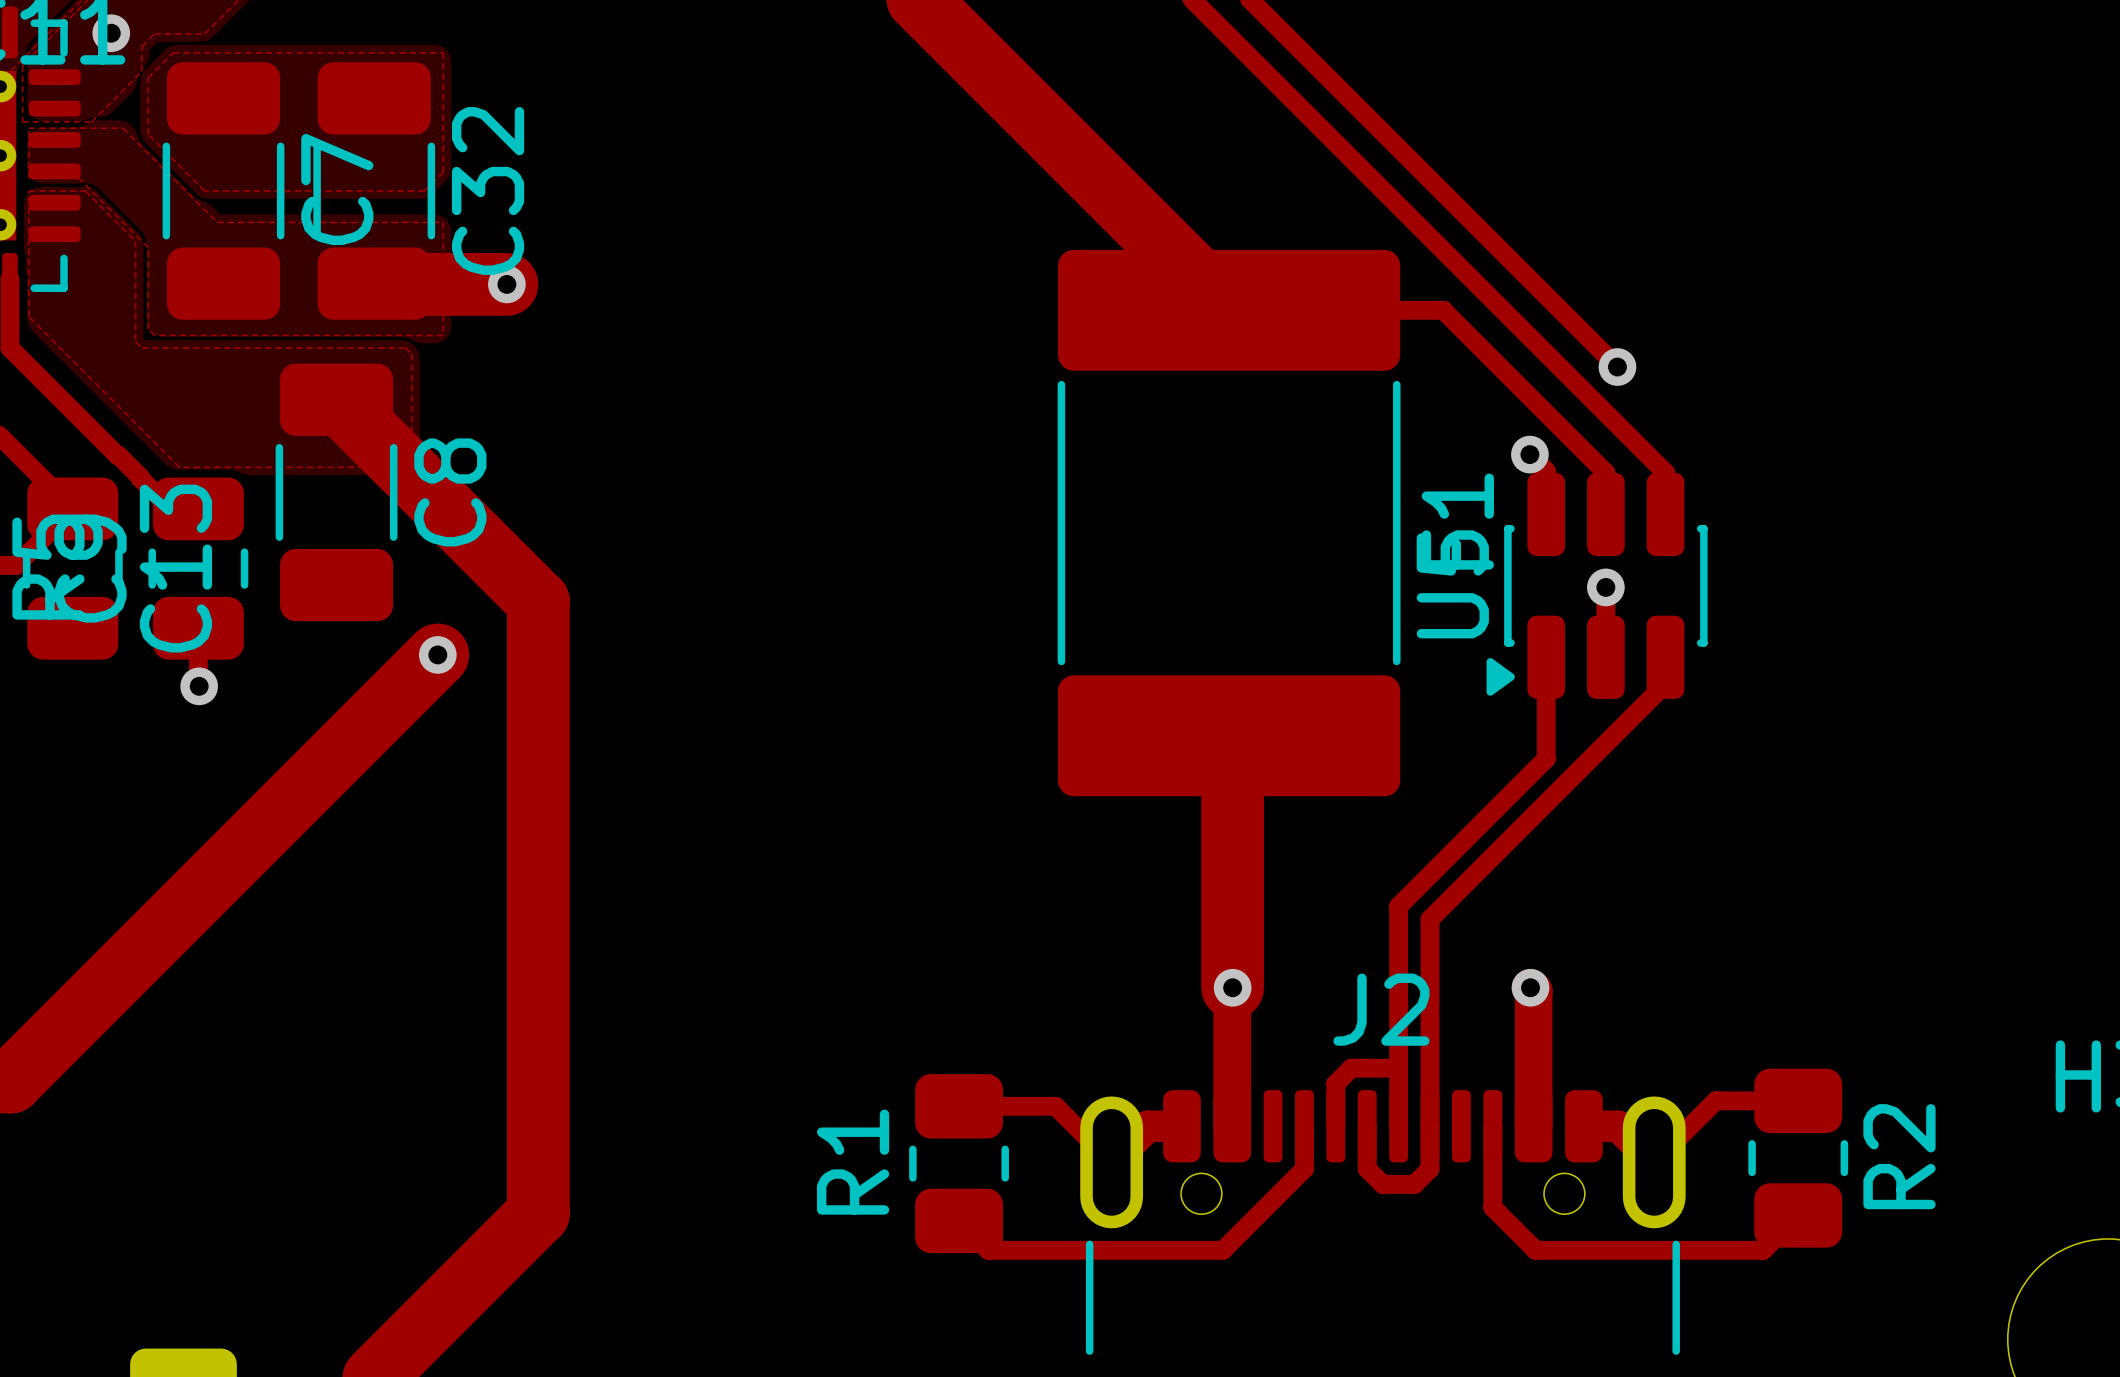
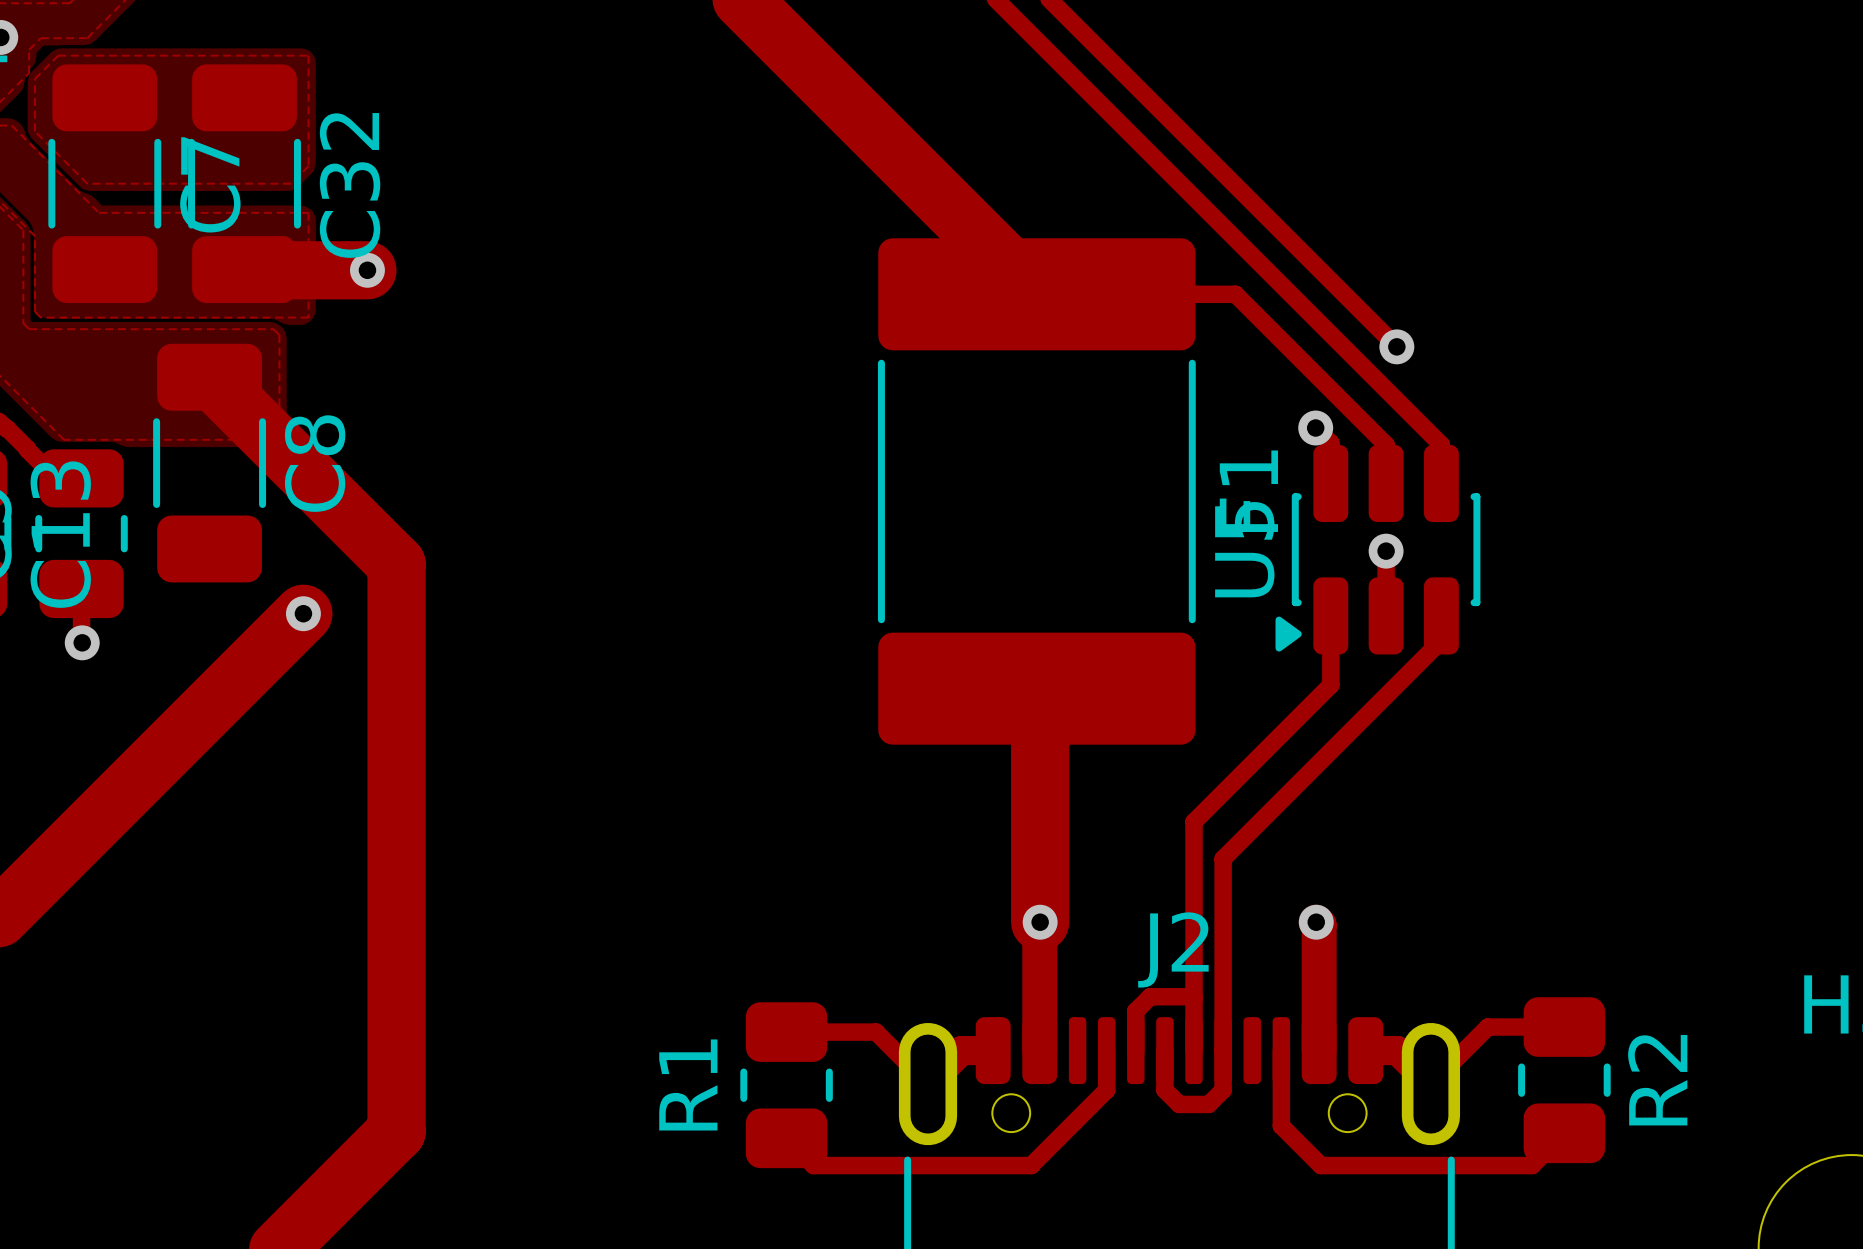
track: (1546, 731) (1546, 758) (1398, 906) -> (1330, 685) (1194, 821) (1194, 846)

